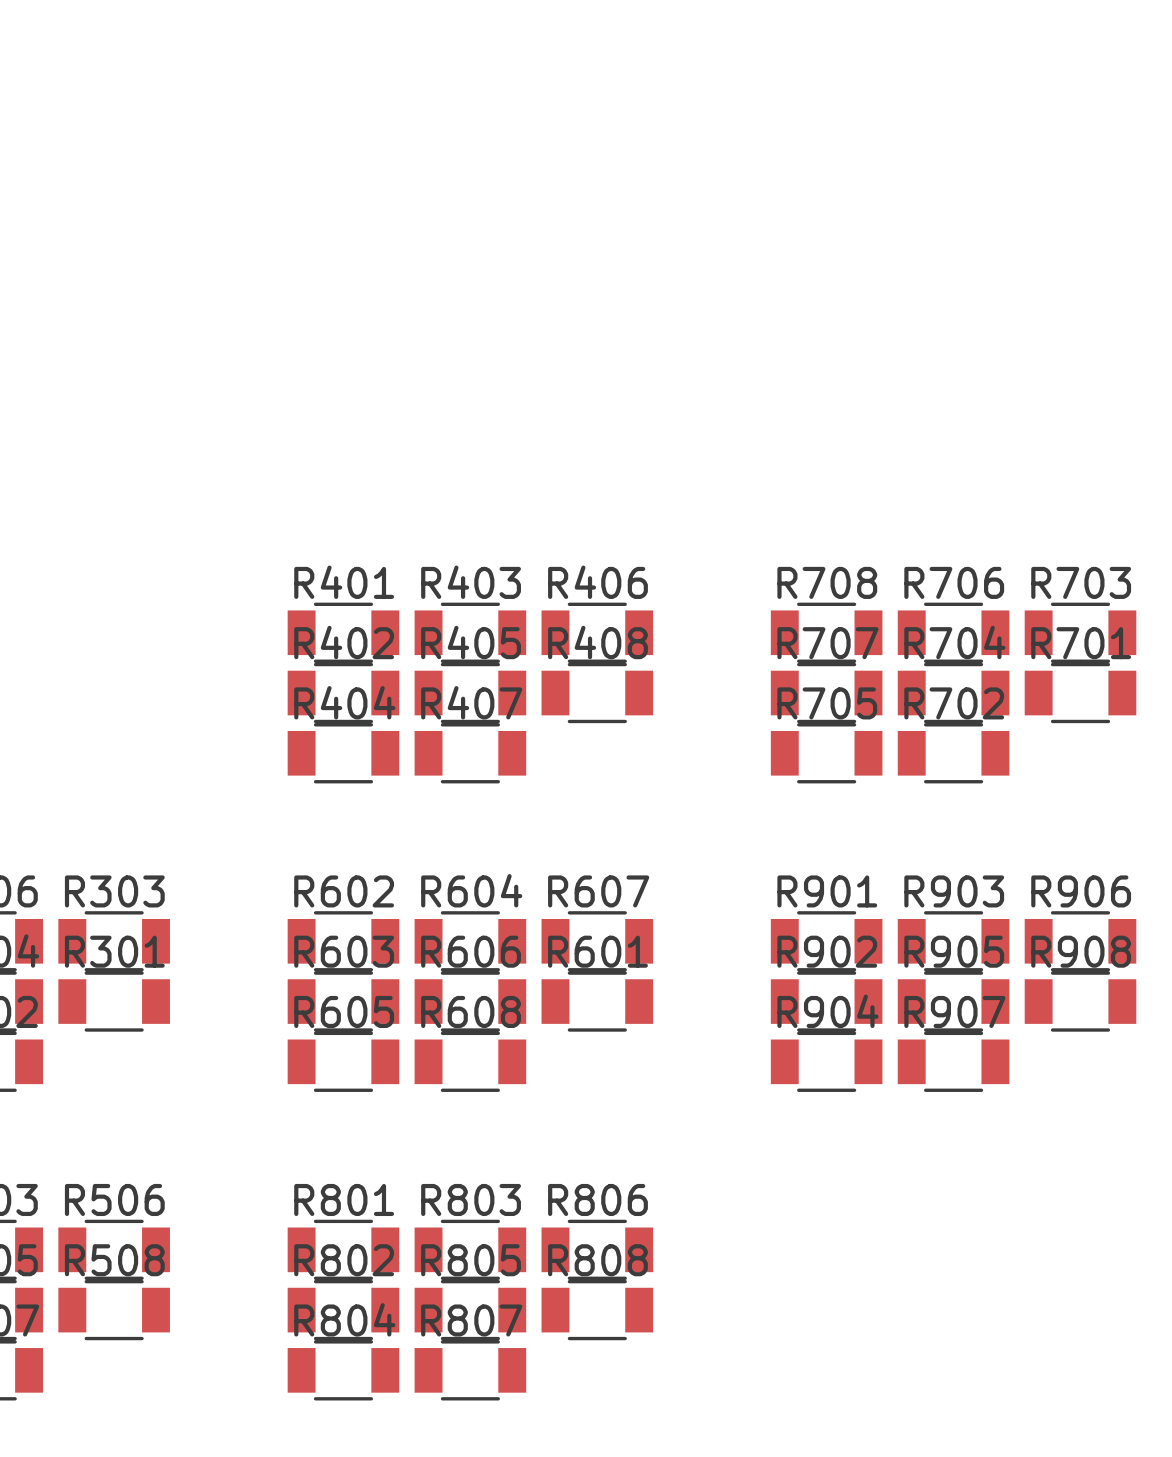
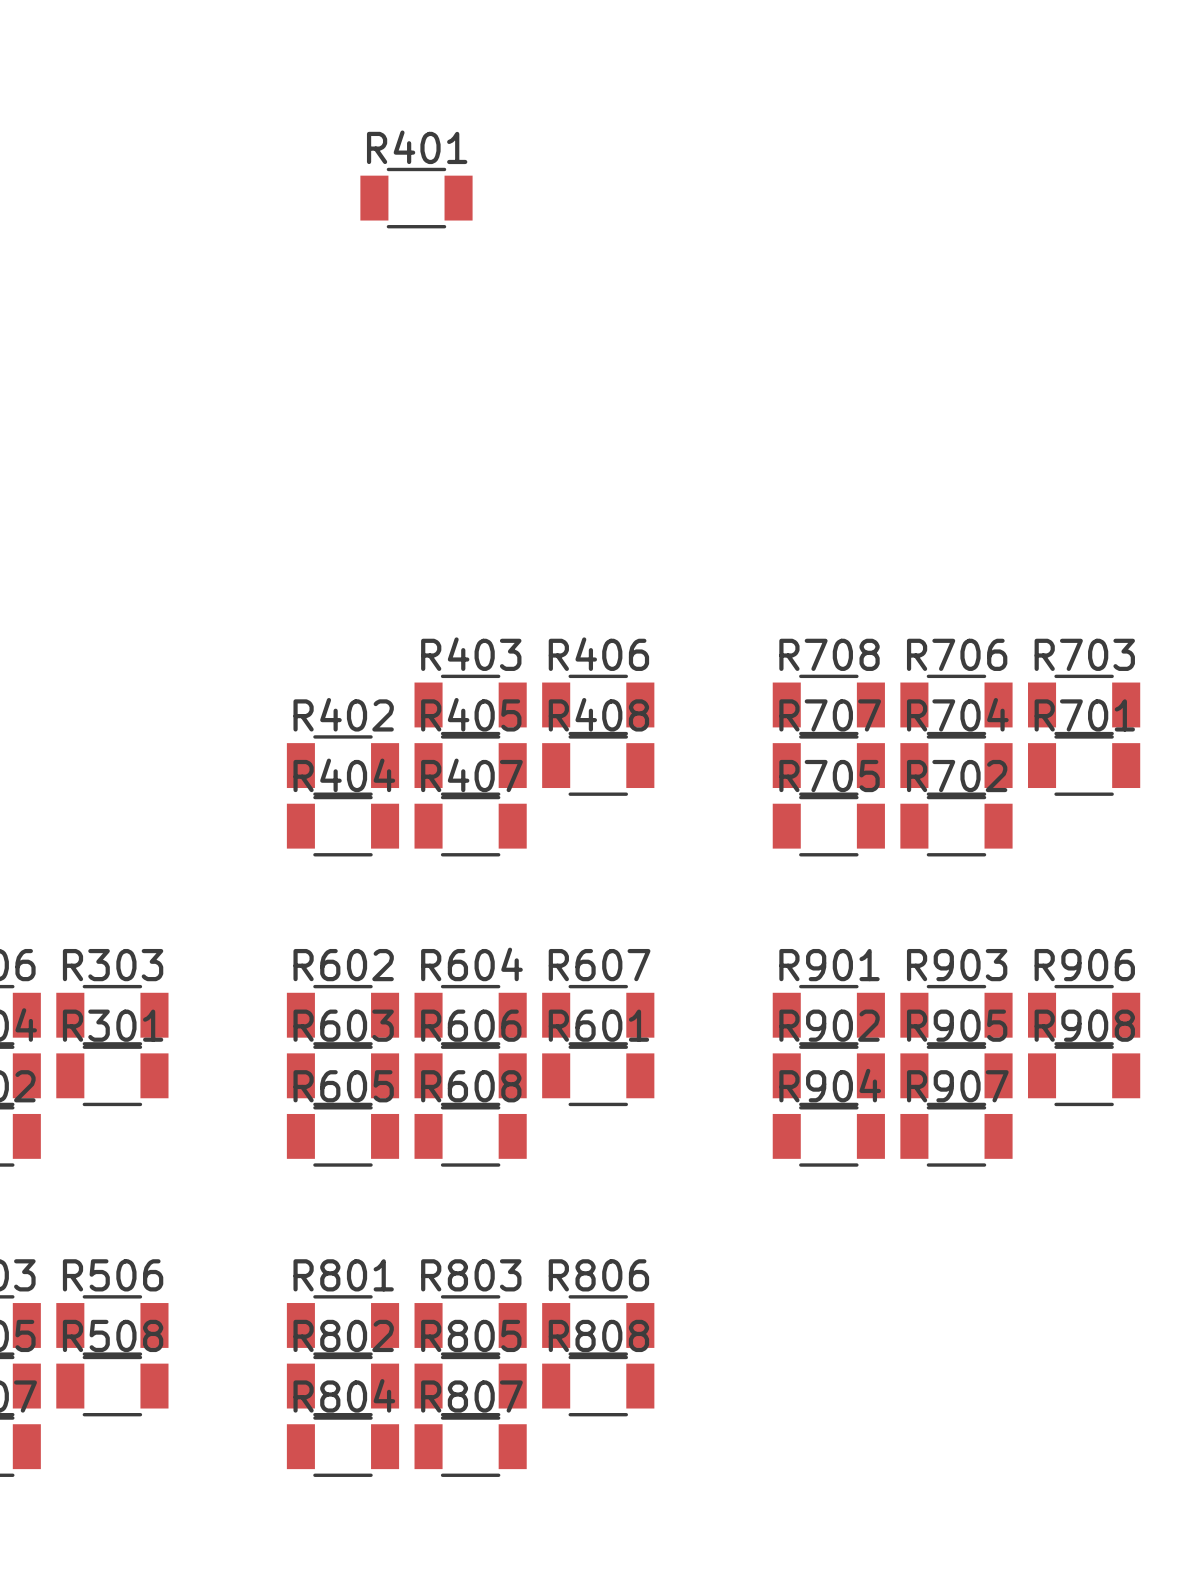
R401 position: (343, 632) -> (416, 198)

